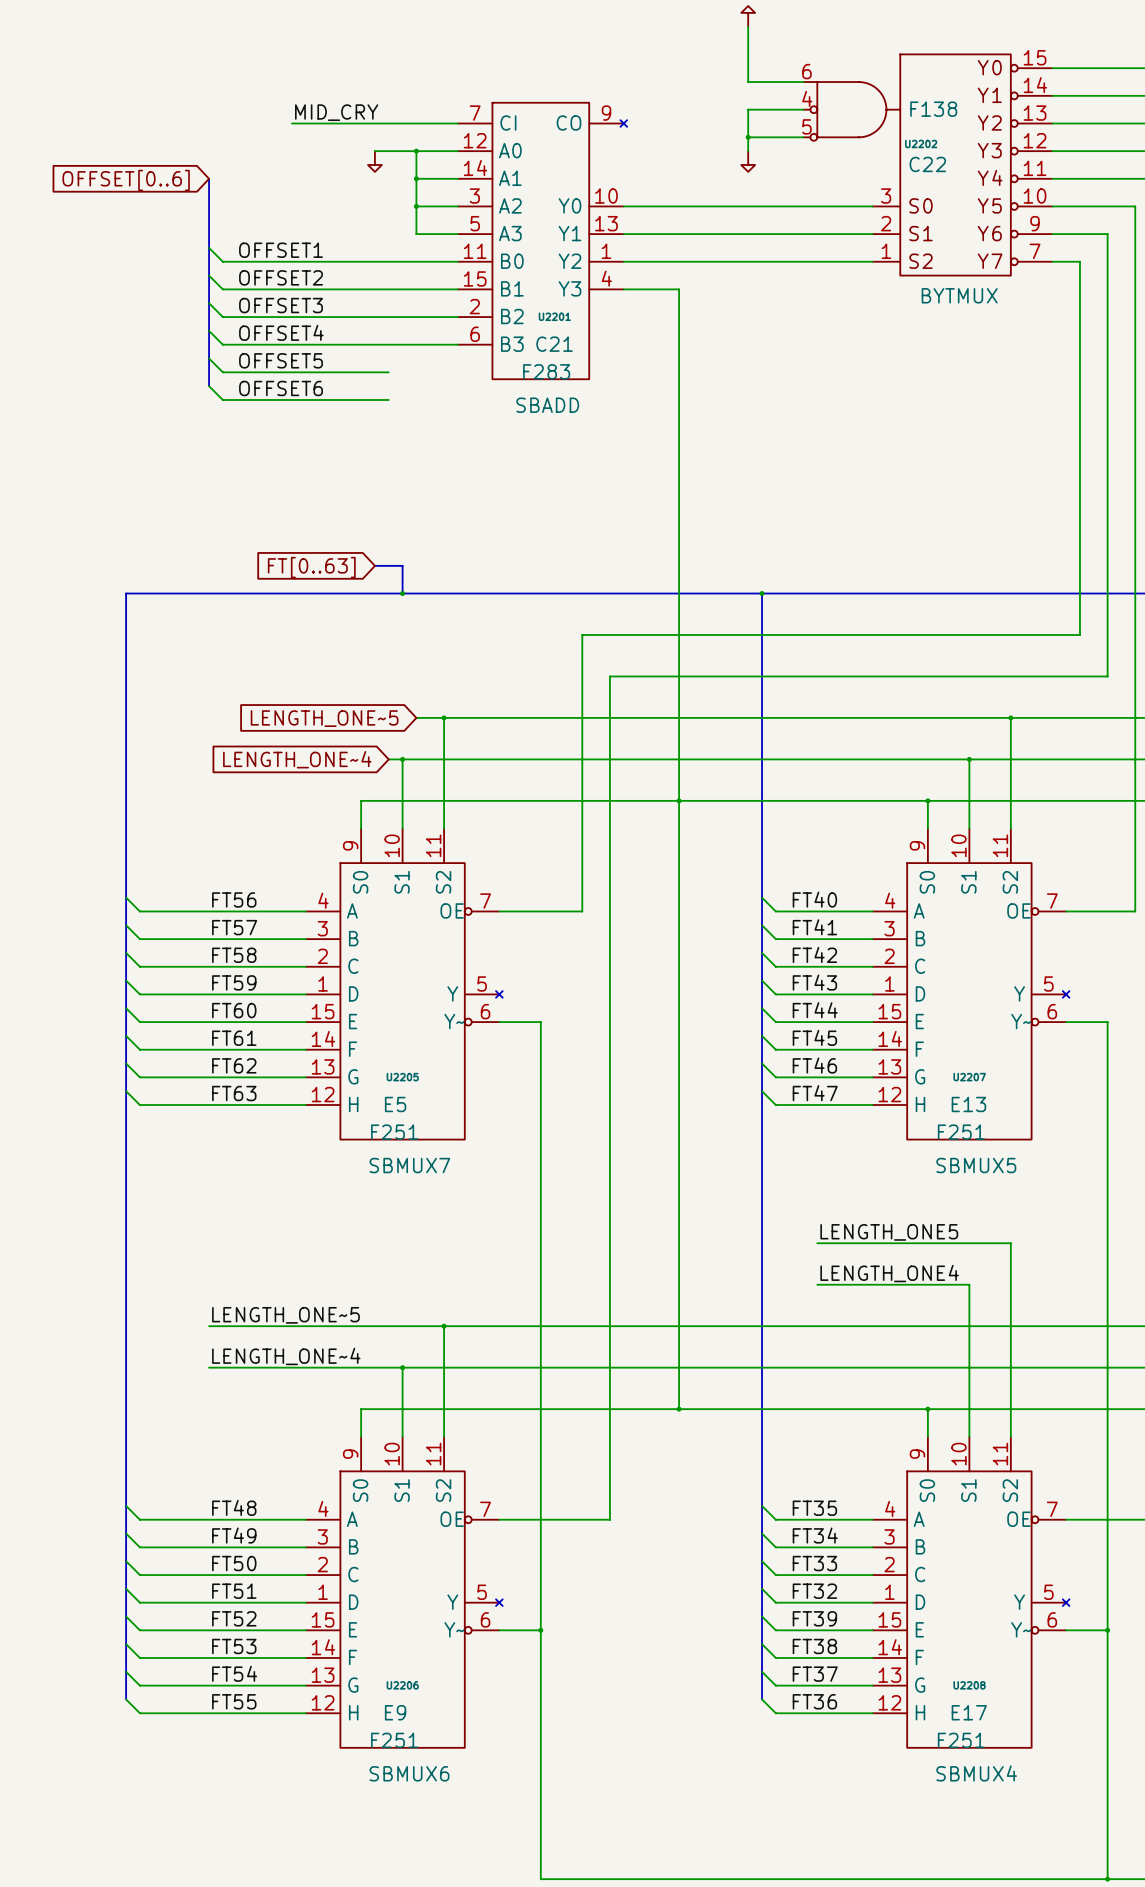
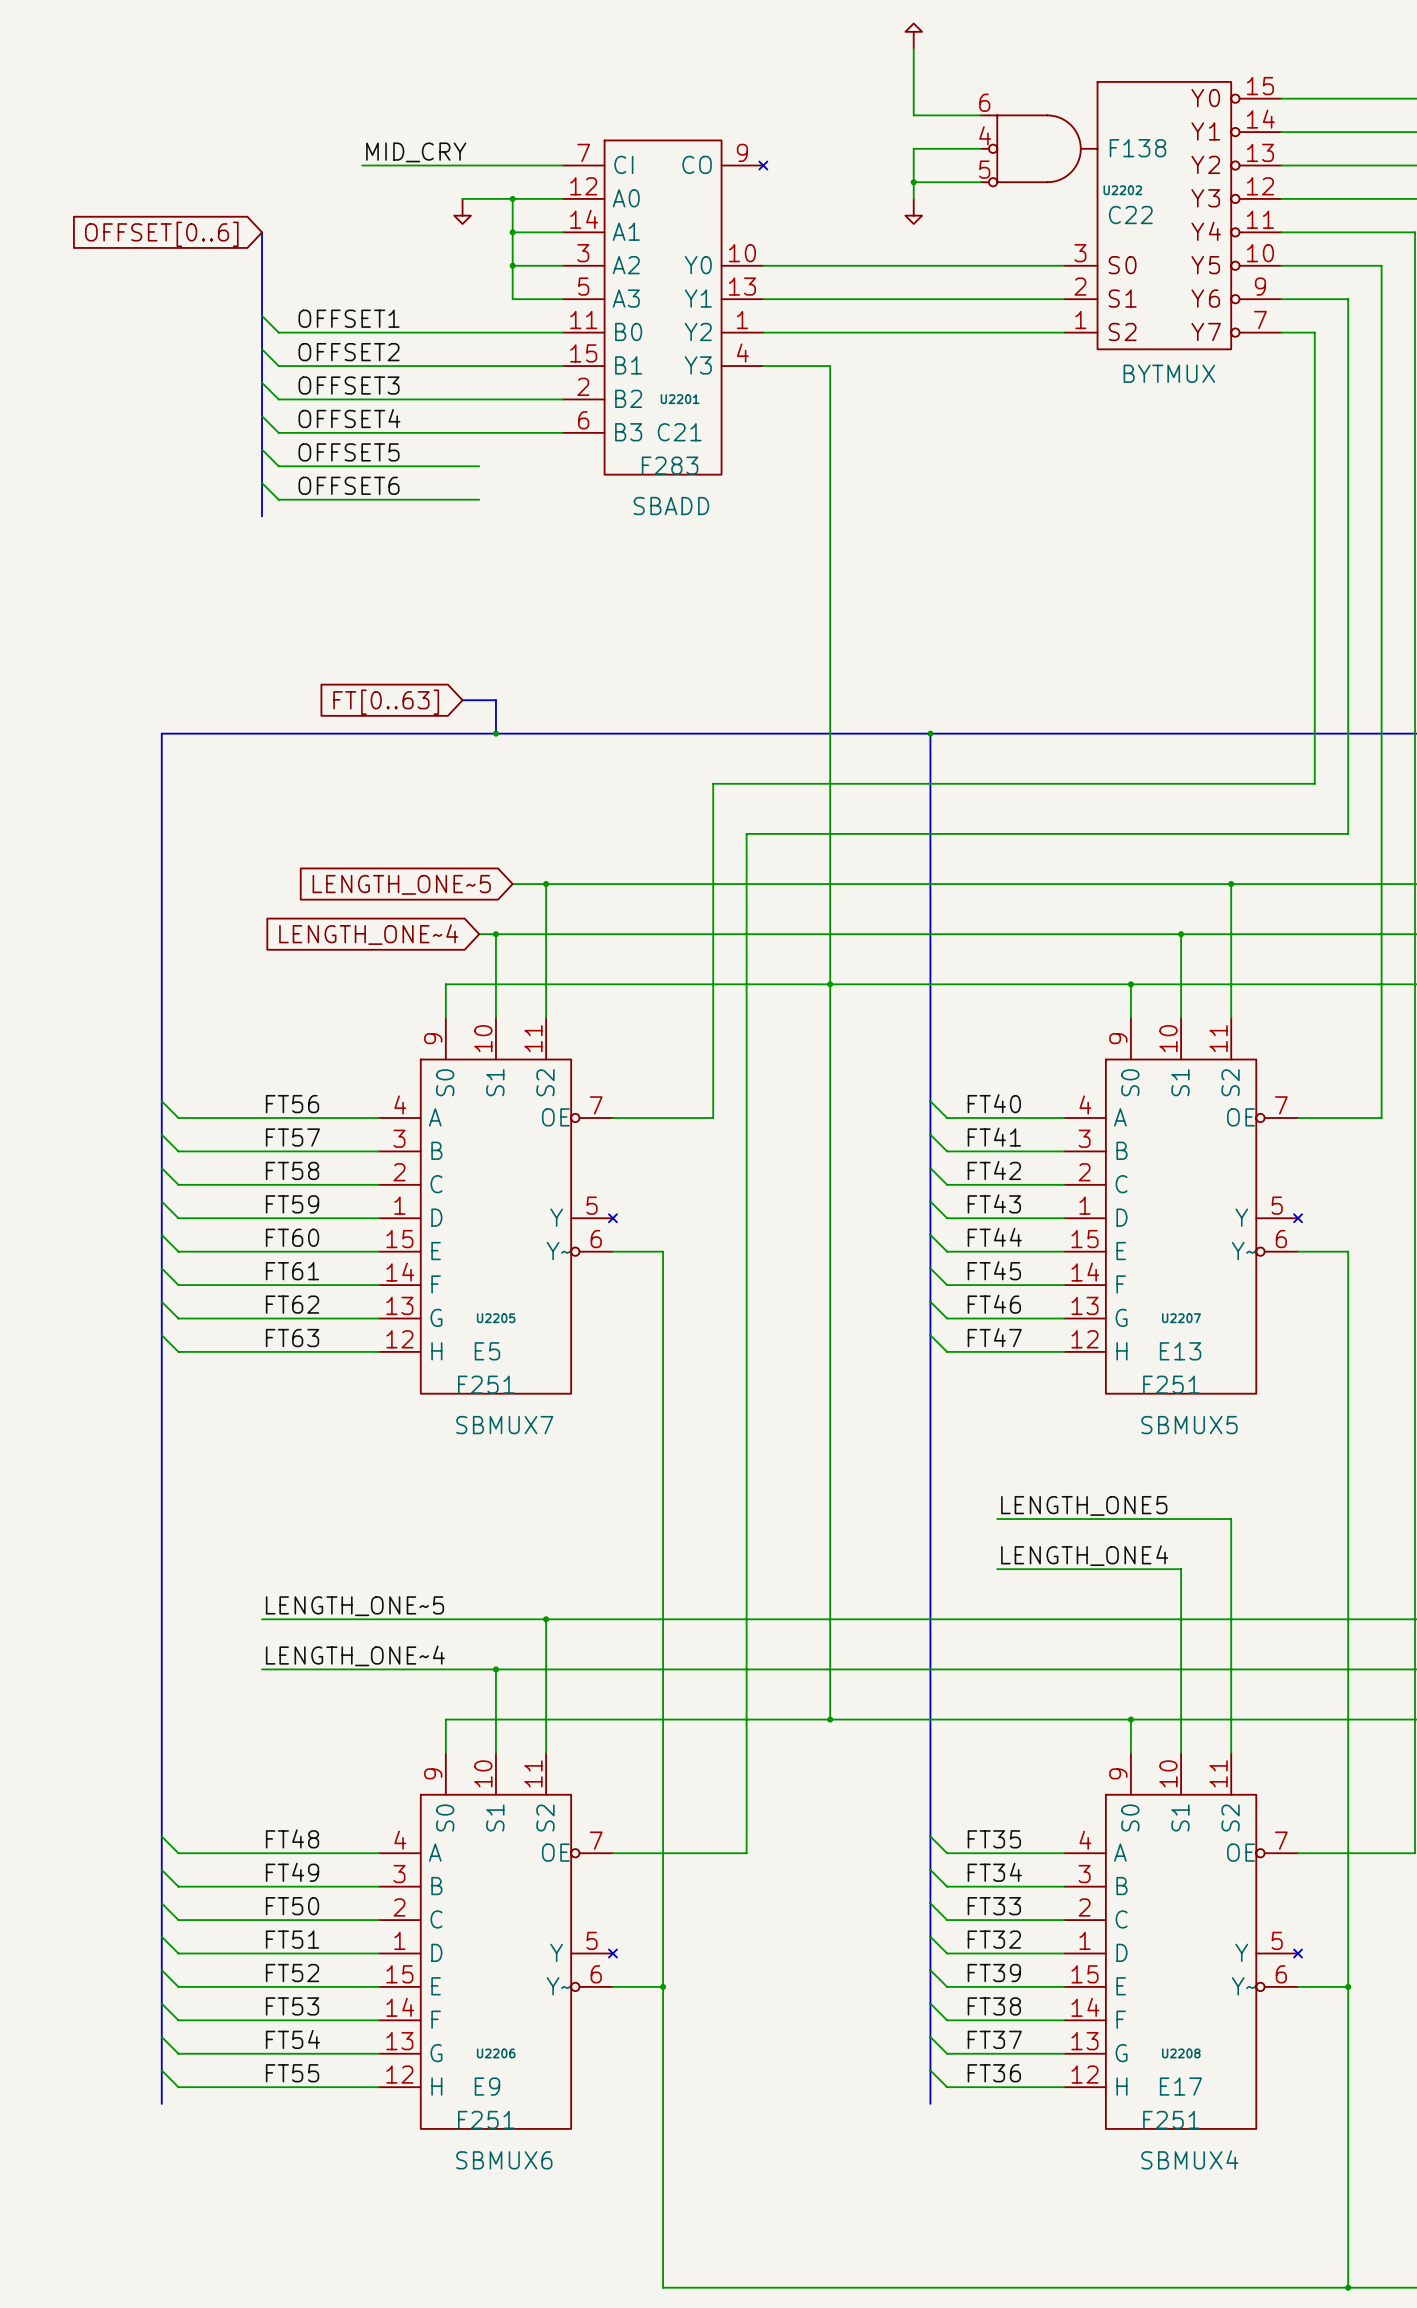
bus: none -> (262, 483) (262, 516)
bus: none -> (161, 2070) (161, 2103)
bus: none -> (930, 2070) (930, 2103)

